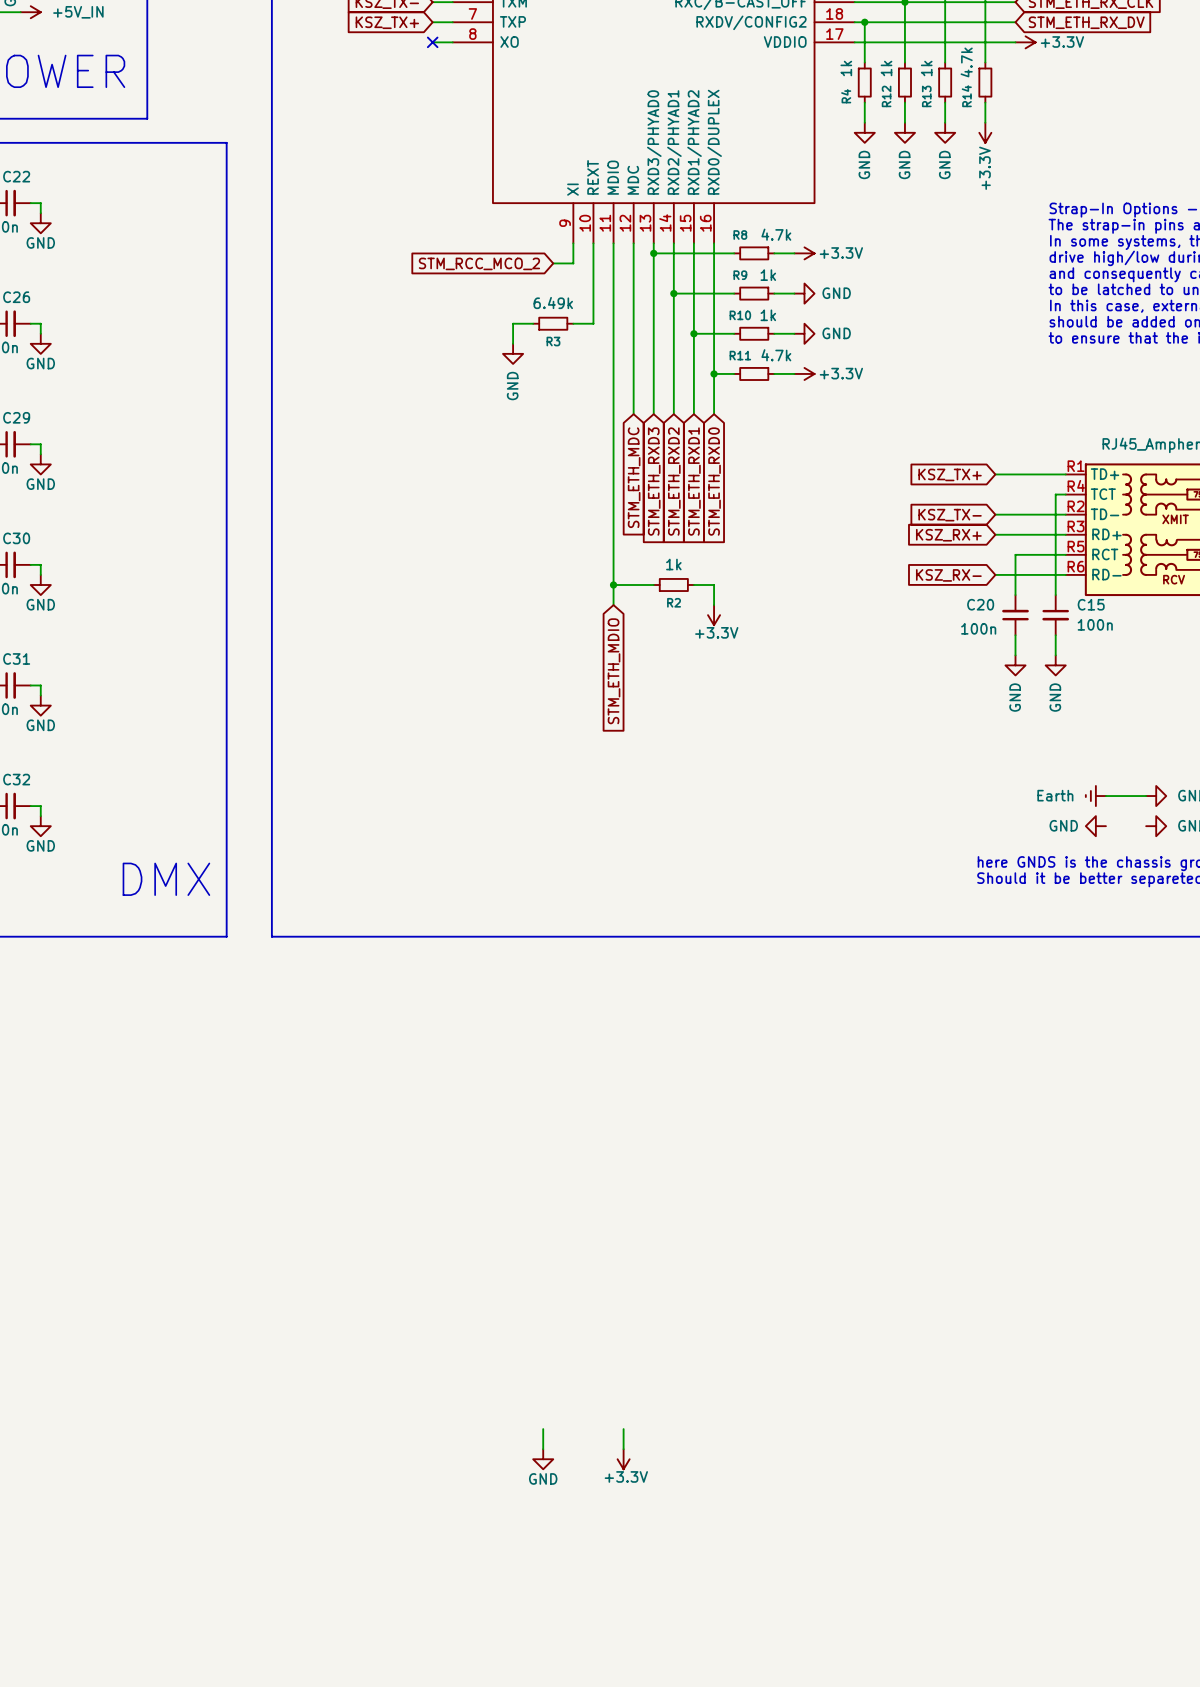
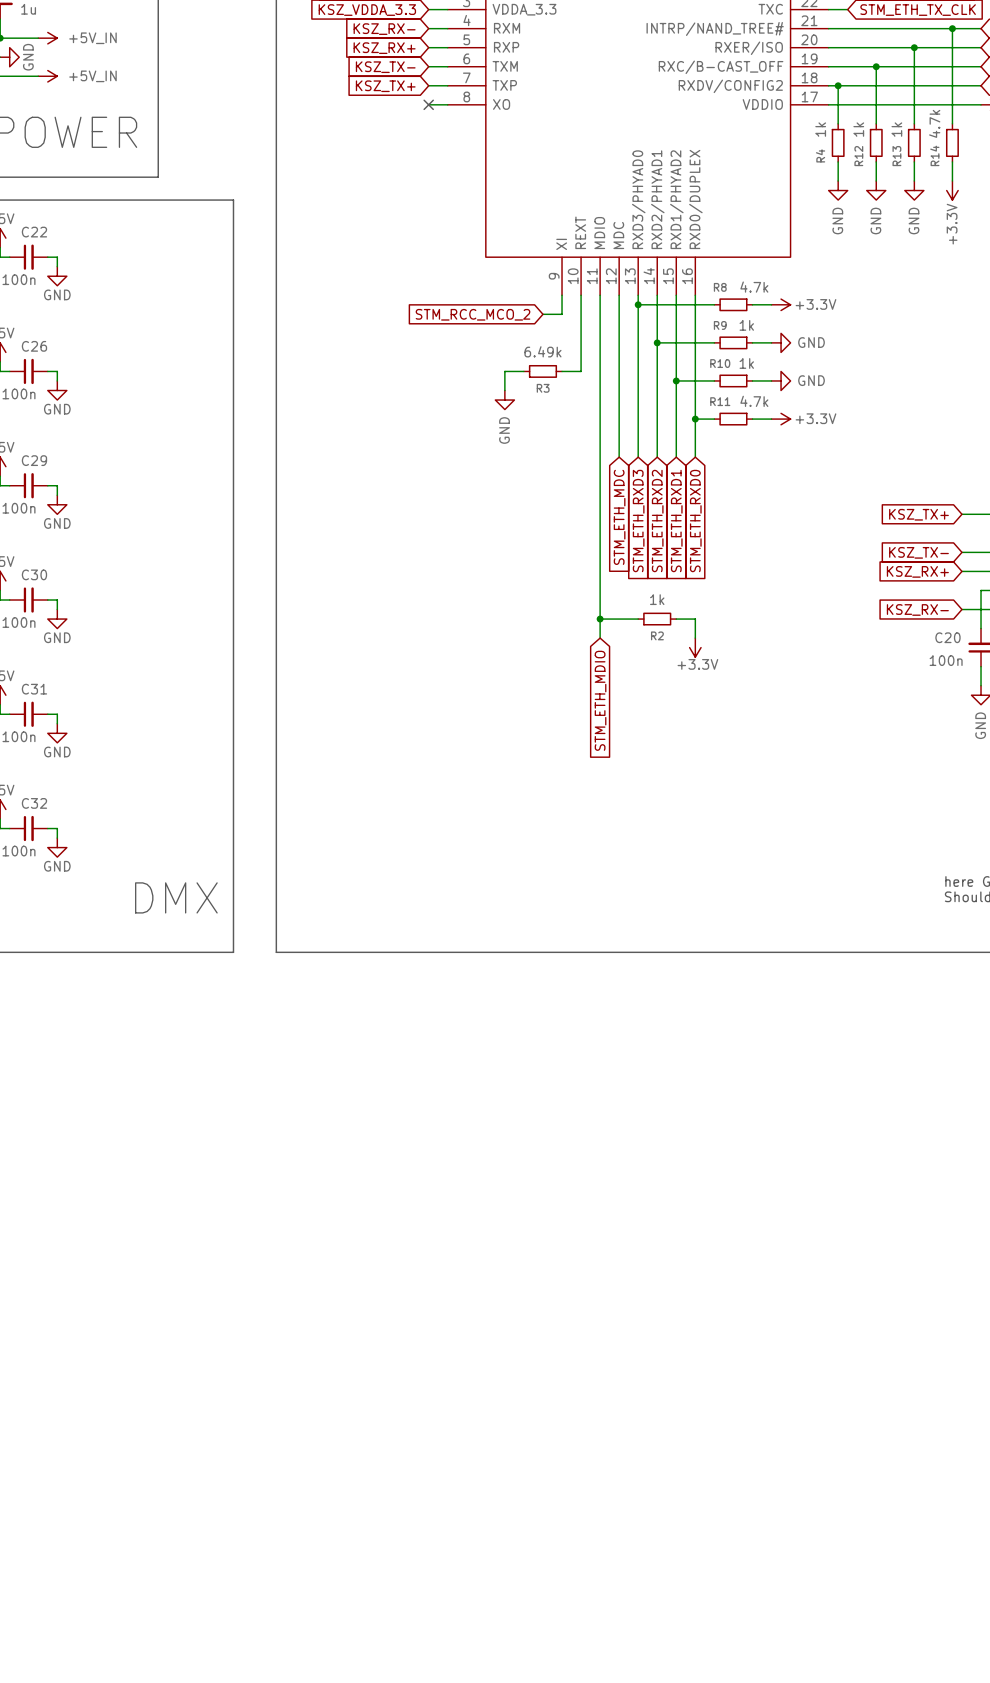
wire: (543, 1429) (543, 1449) -> none
wire: (623, 1429) (623, 1449) -> none
power symbol: GND (543, 1459) -> none
power symbol: +3.3V (623, 1459) -> none

